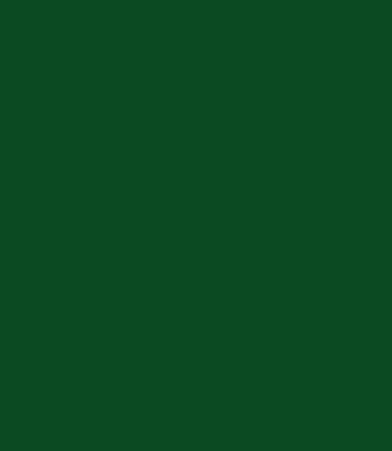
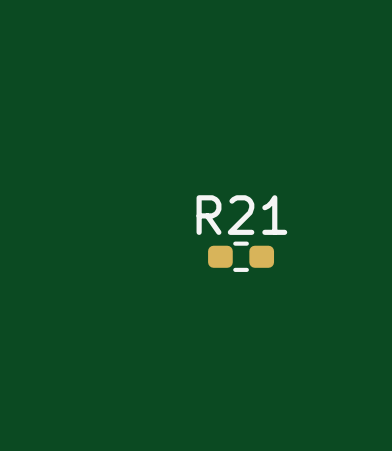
R21: none -> (241, 256)

